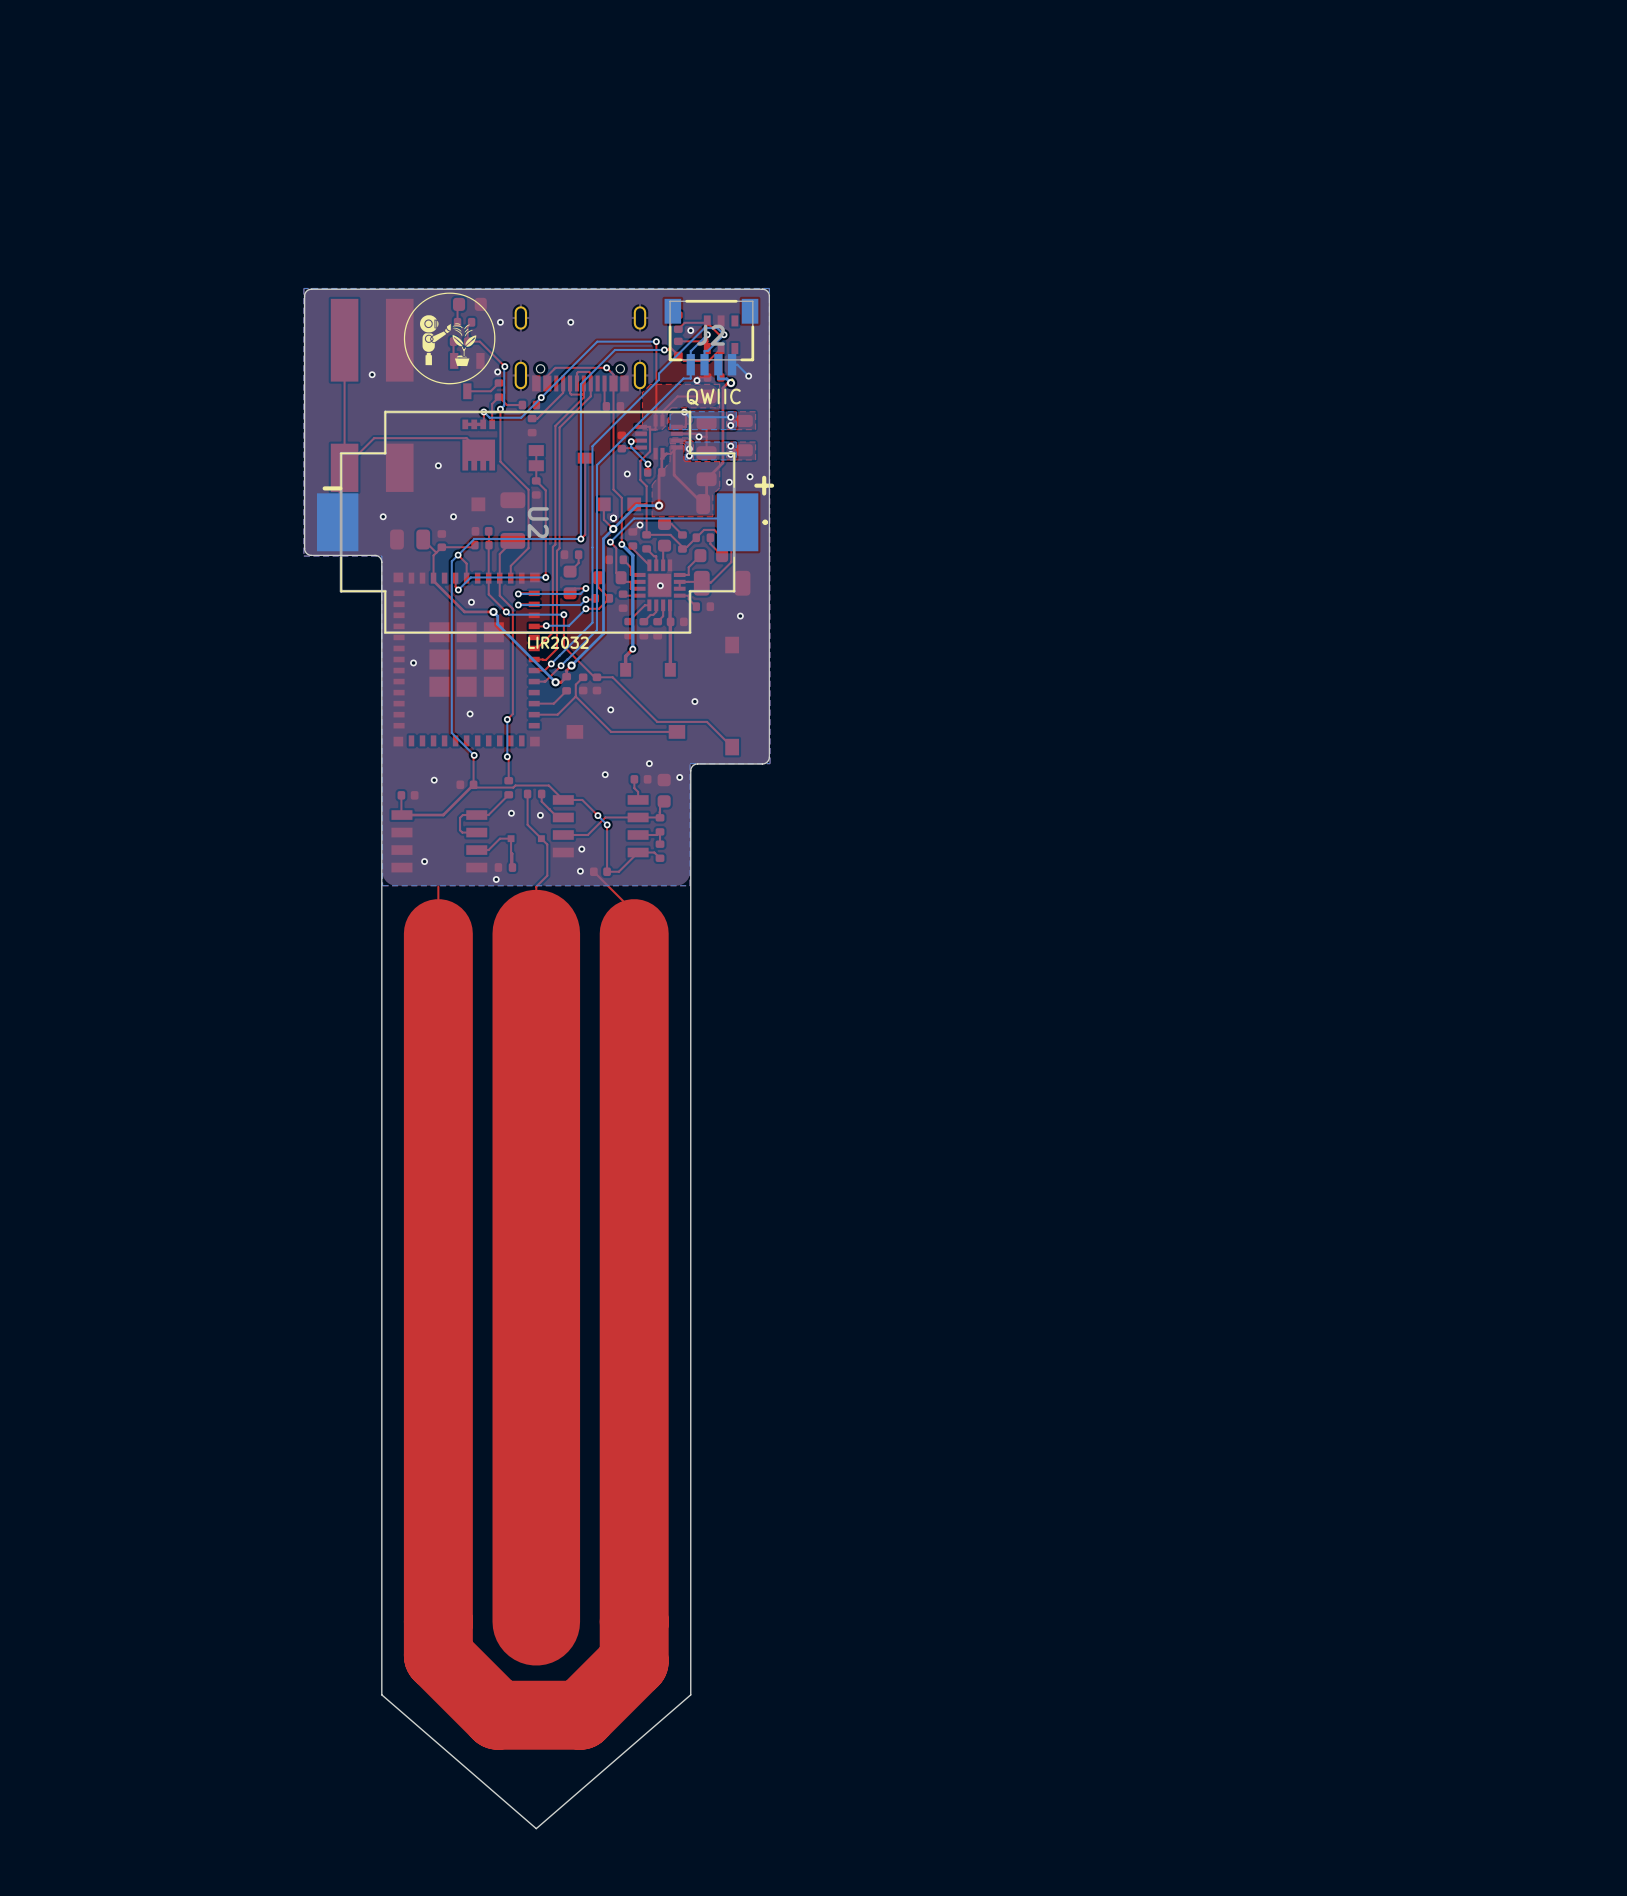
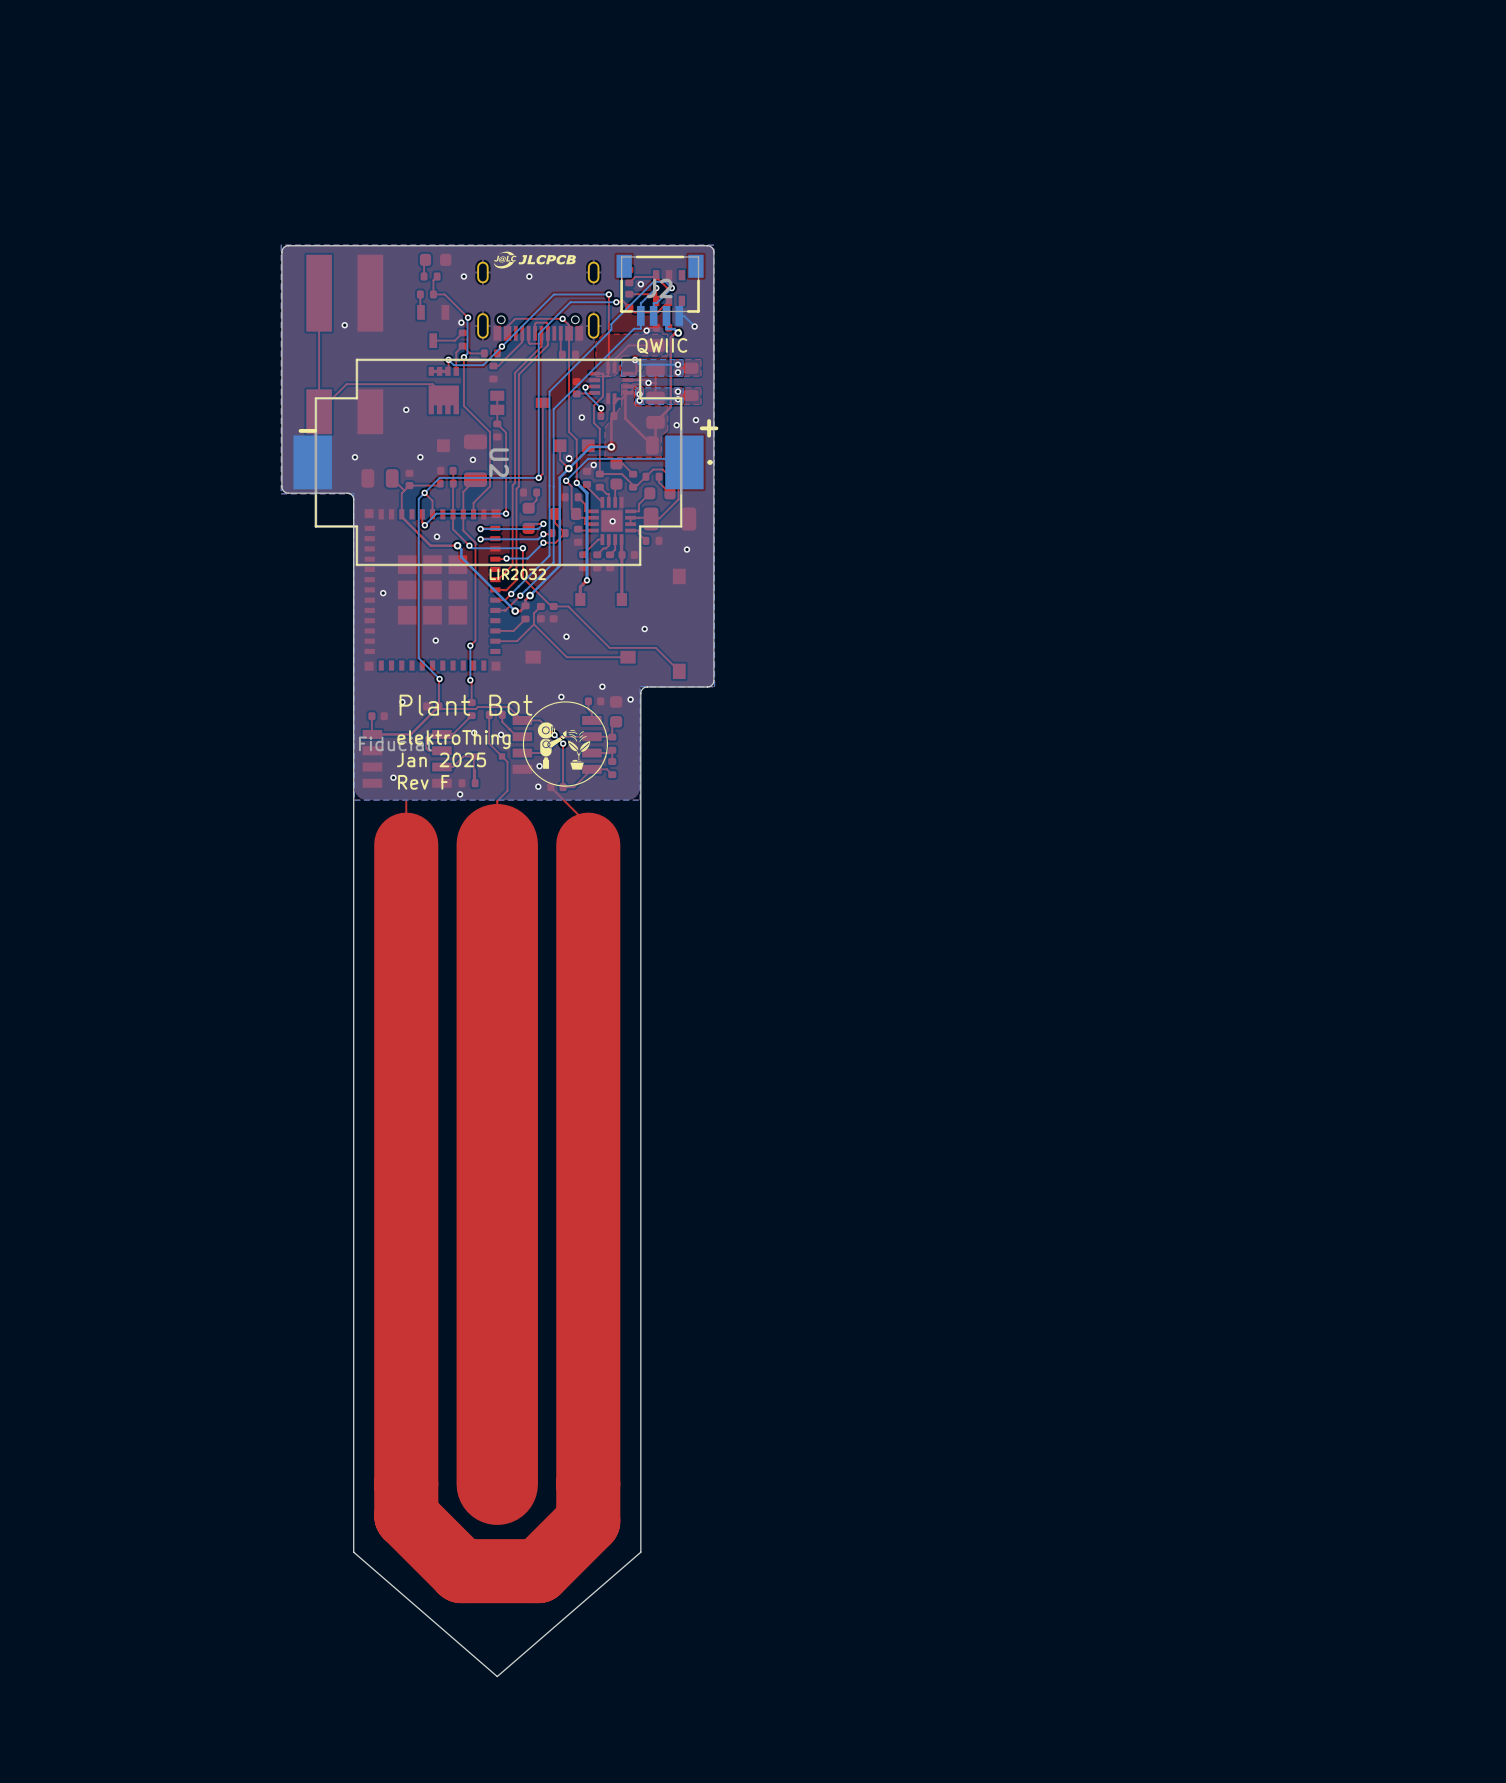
drawing: [403, 292, 496, 385] -> none
drawing: none -> [493, 251, 576, 269]
drawing: none -> [522, 701, 608, 787]

